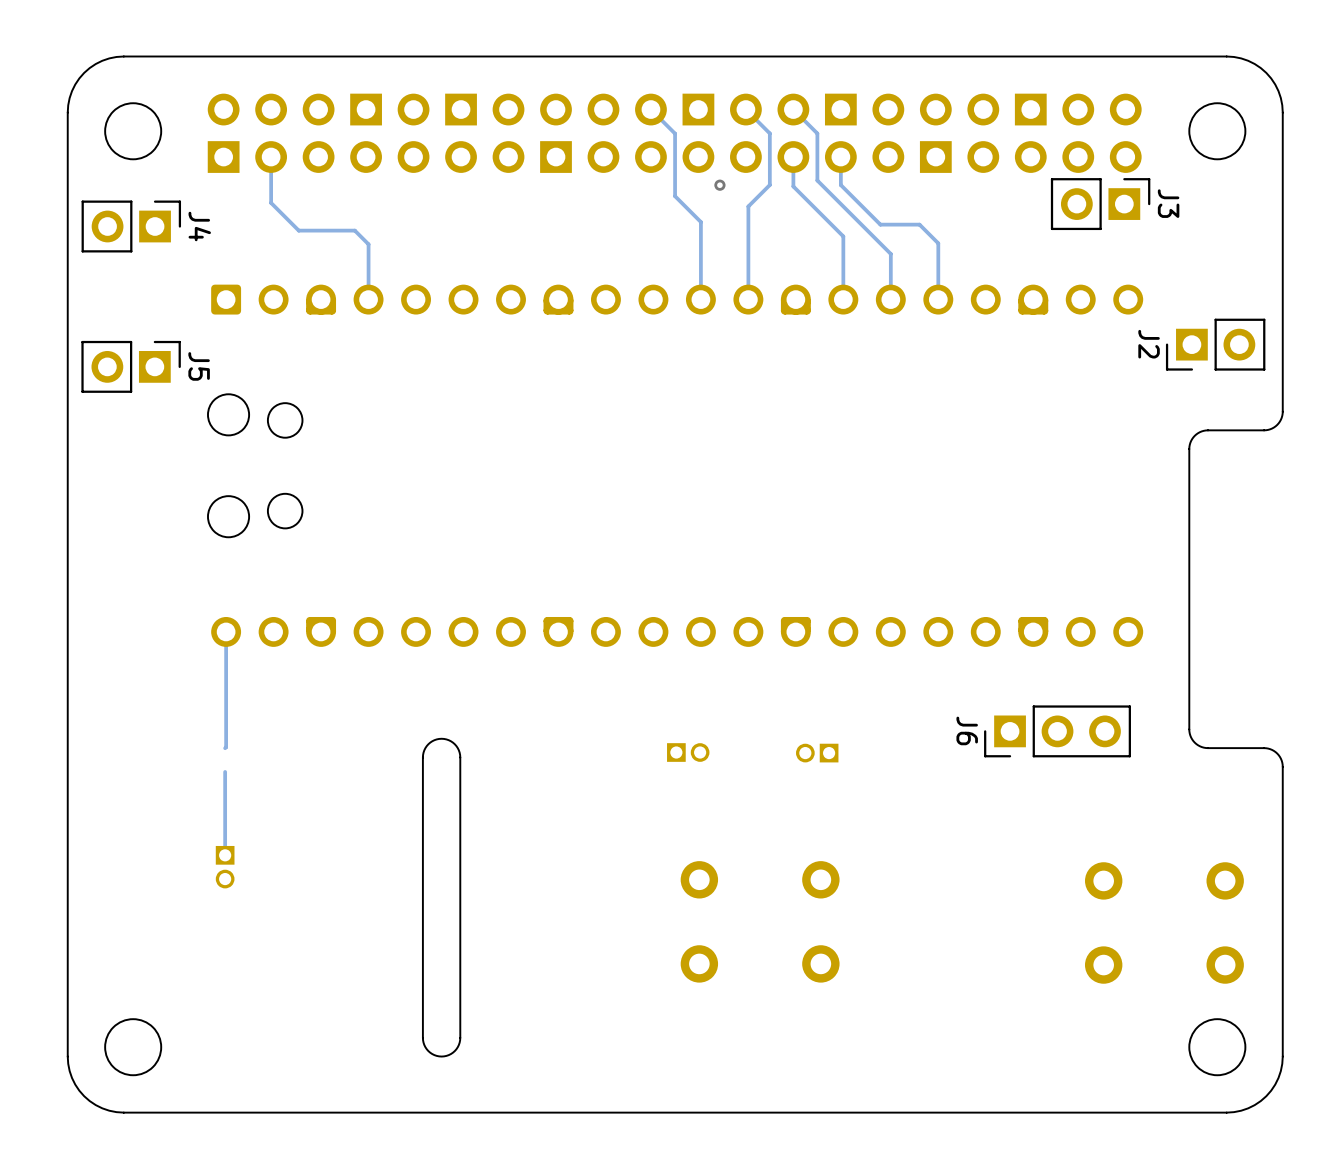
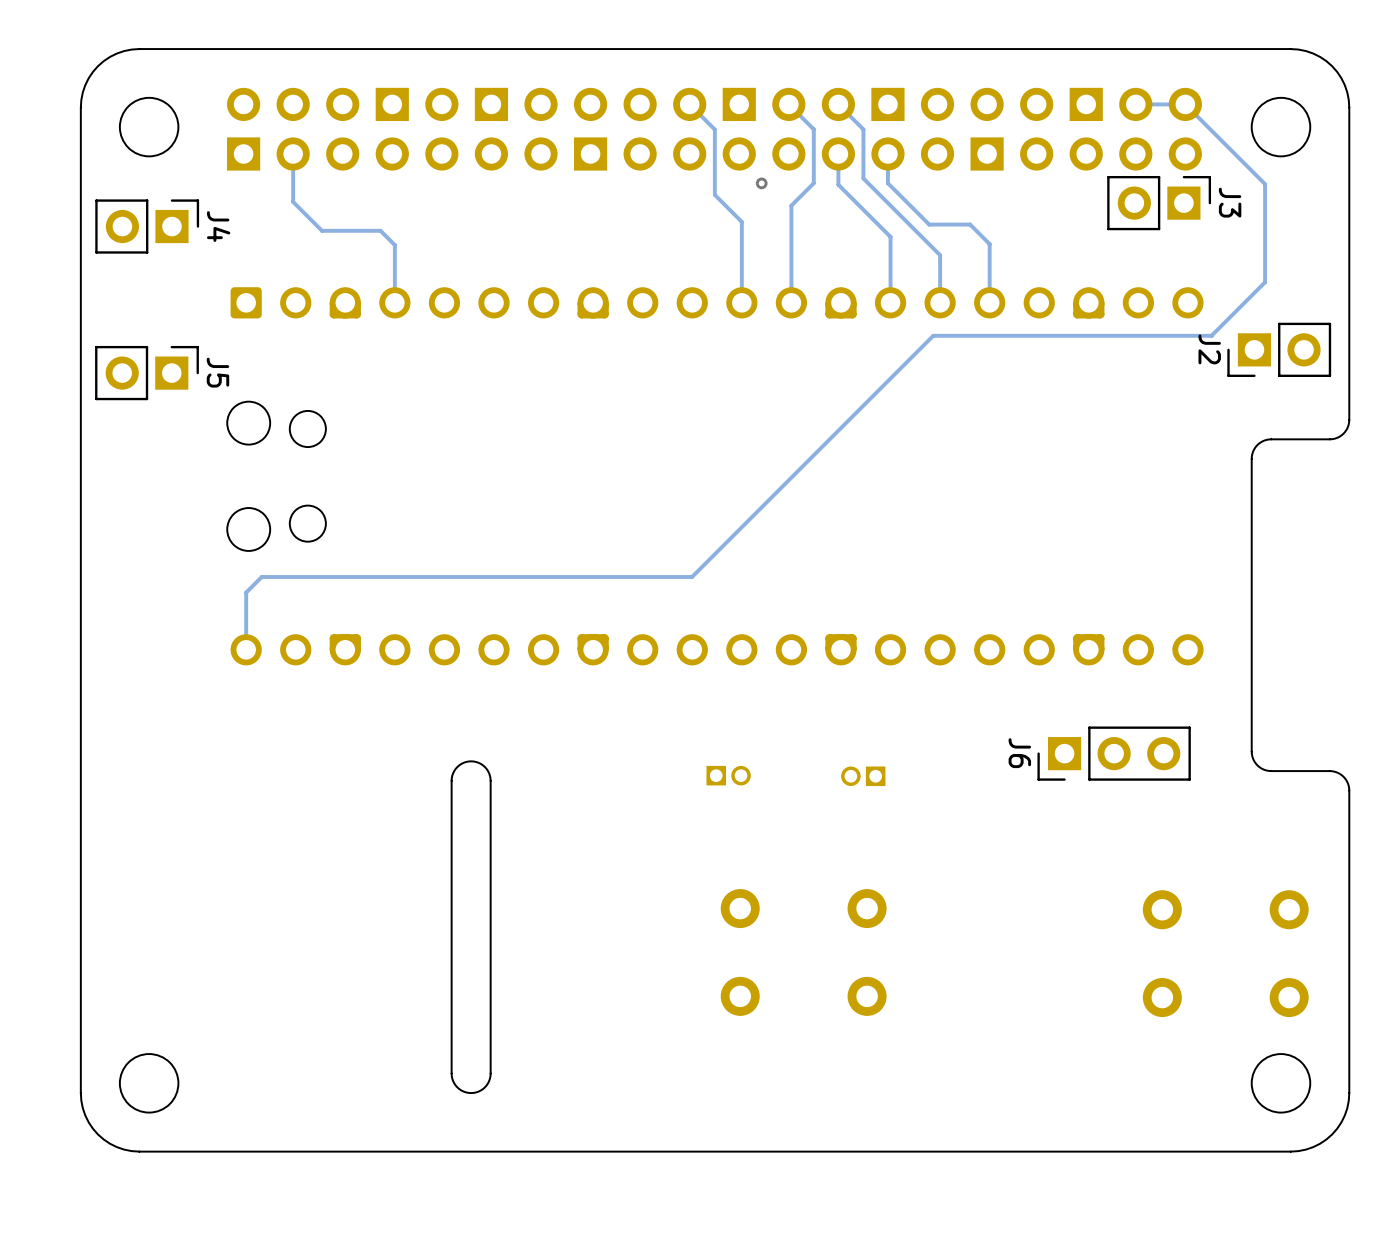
track: none -> (1135, 104) (1185, 104) (1265, 184) (1265, 282) (1211, 335)
track: (226, 631) (225, 748) -> (246, 649) (246, 592) (261, 577) (692, 577) (933, 335) (1211, 335)
track: (225, 771) (225, 855) -> none
part: (225, 867) -> none

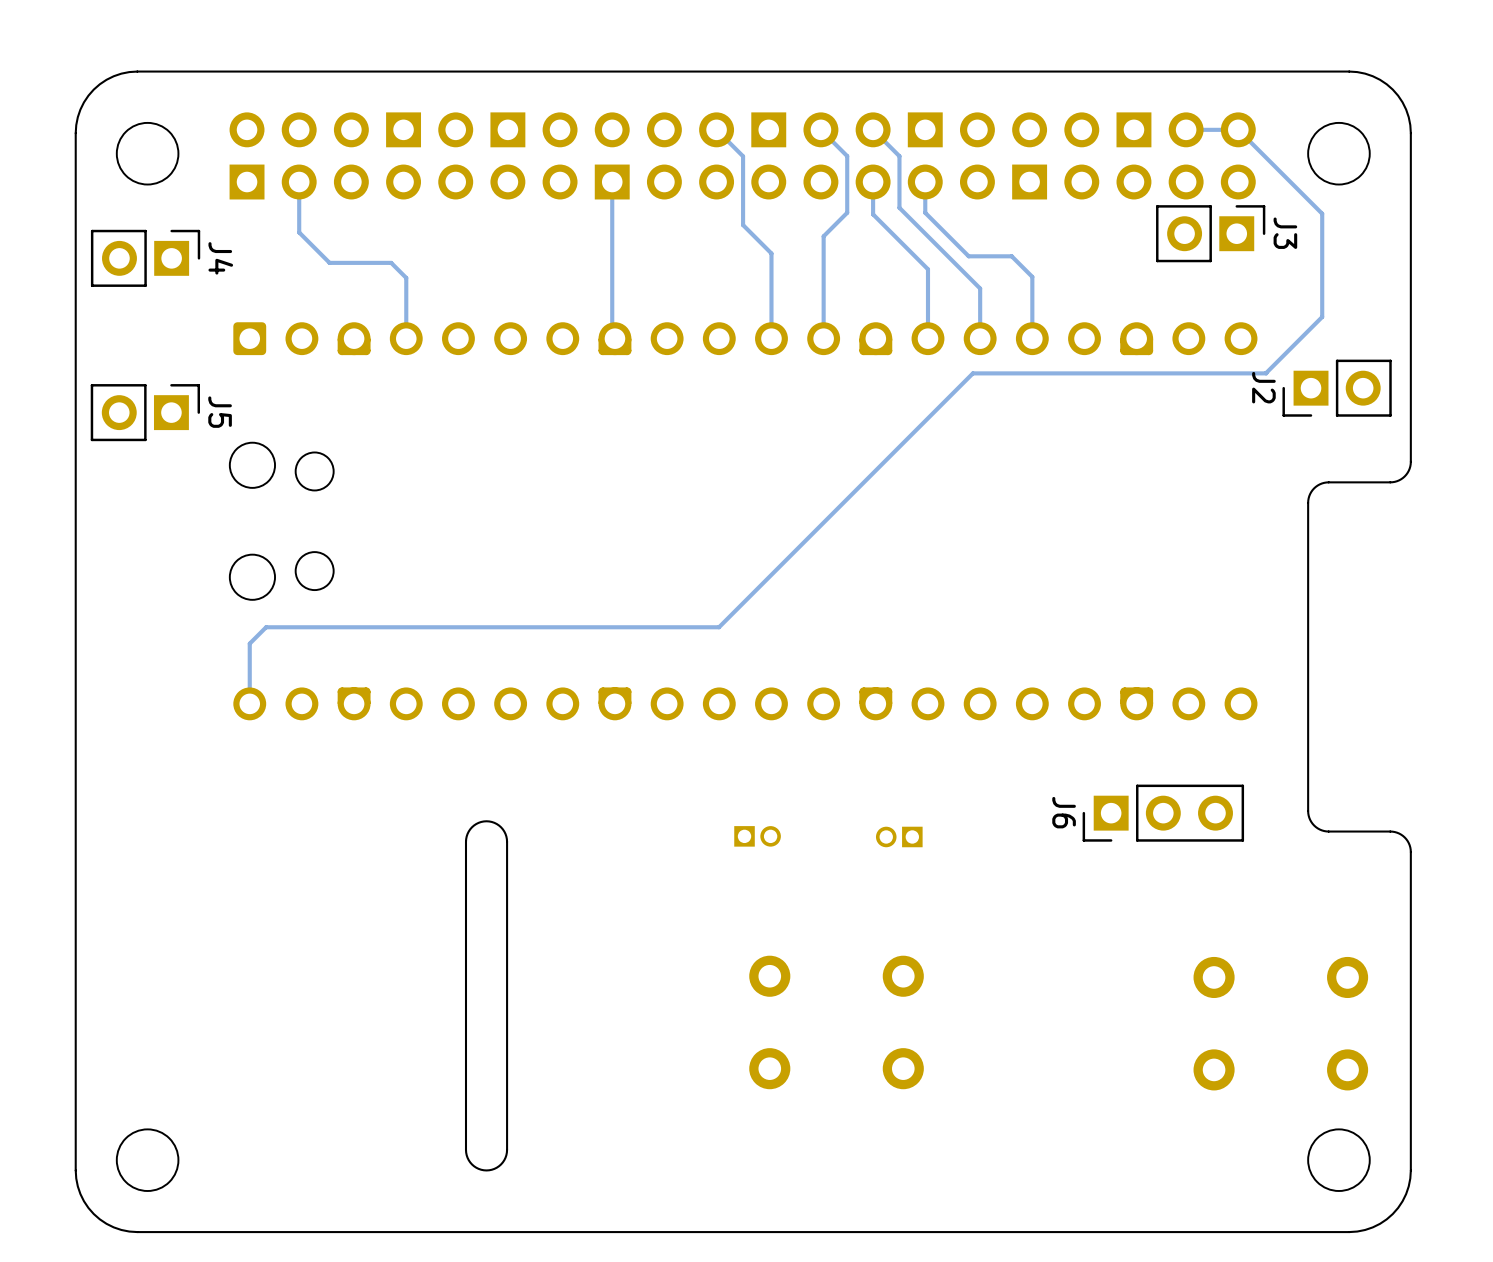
track: none -> (612, 182) (612, 335)
via: (761, 183) -> none

